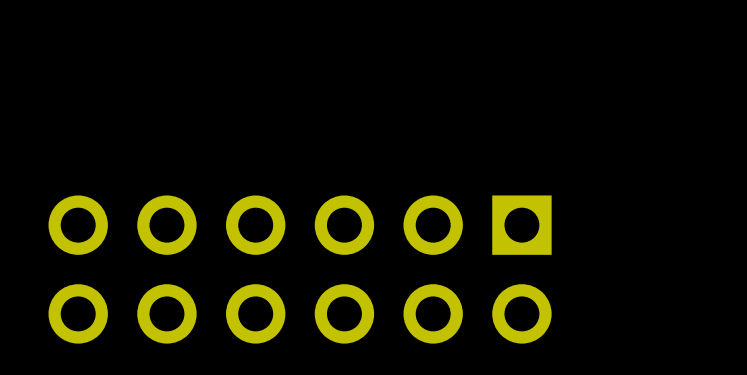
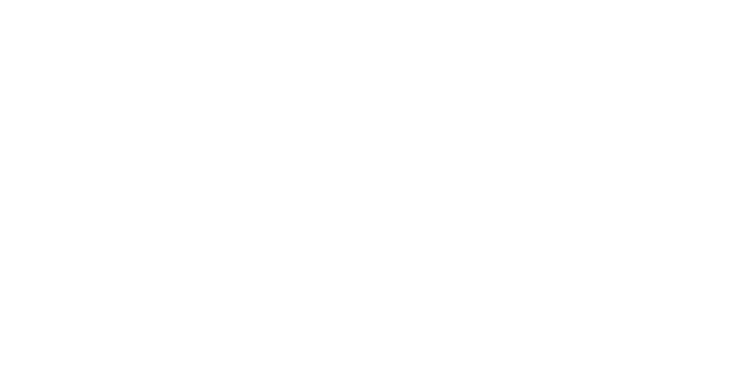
part: (300, 269) -> none

